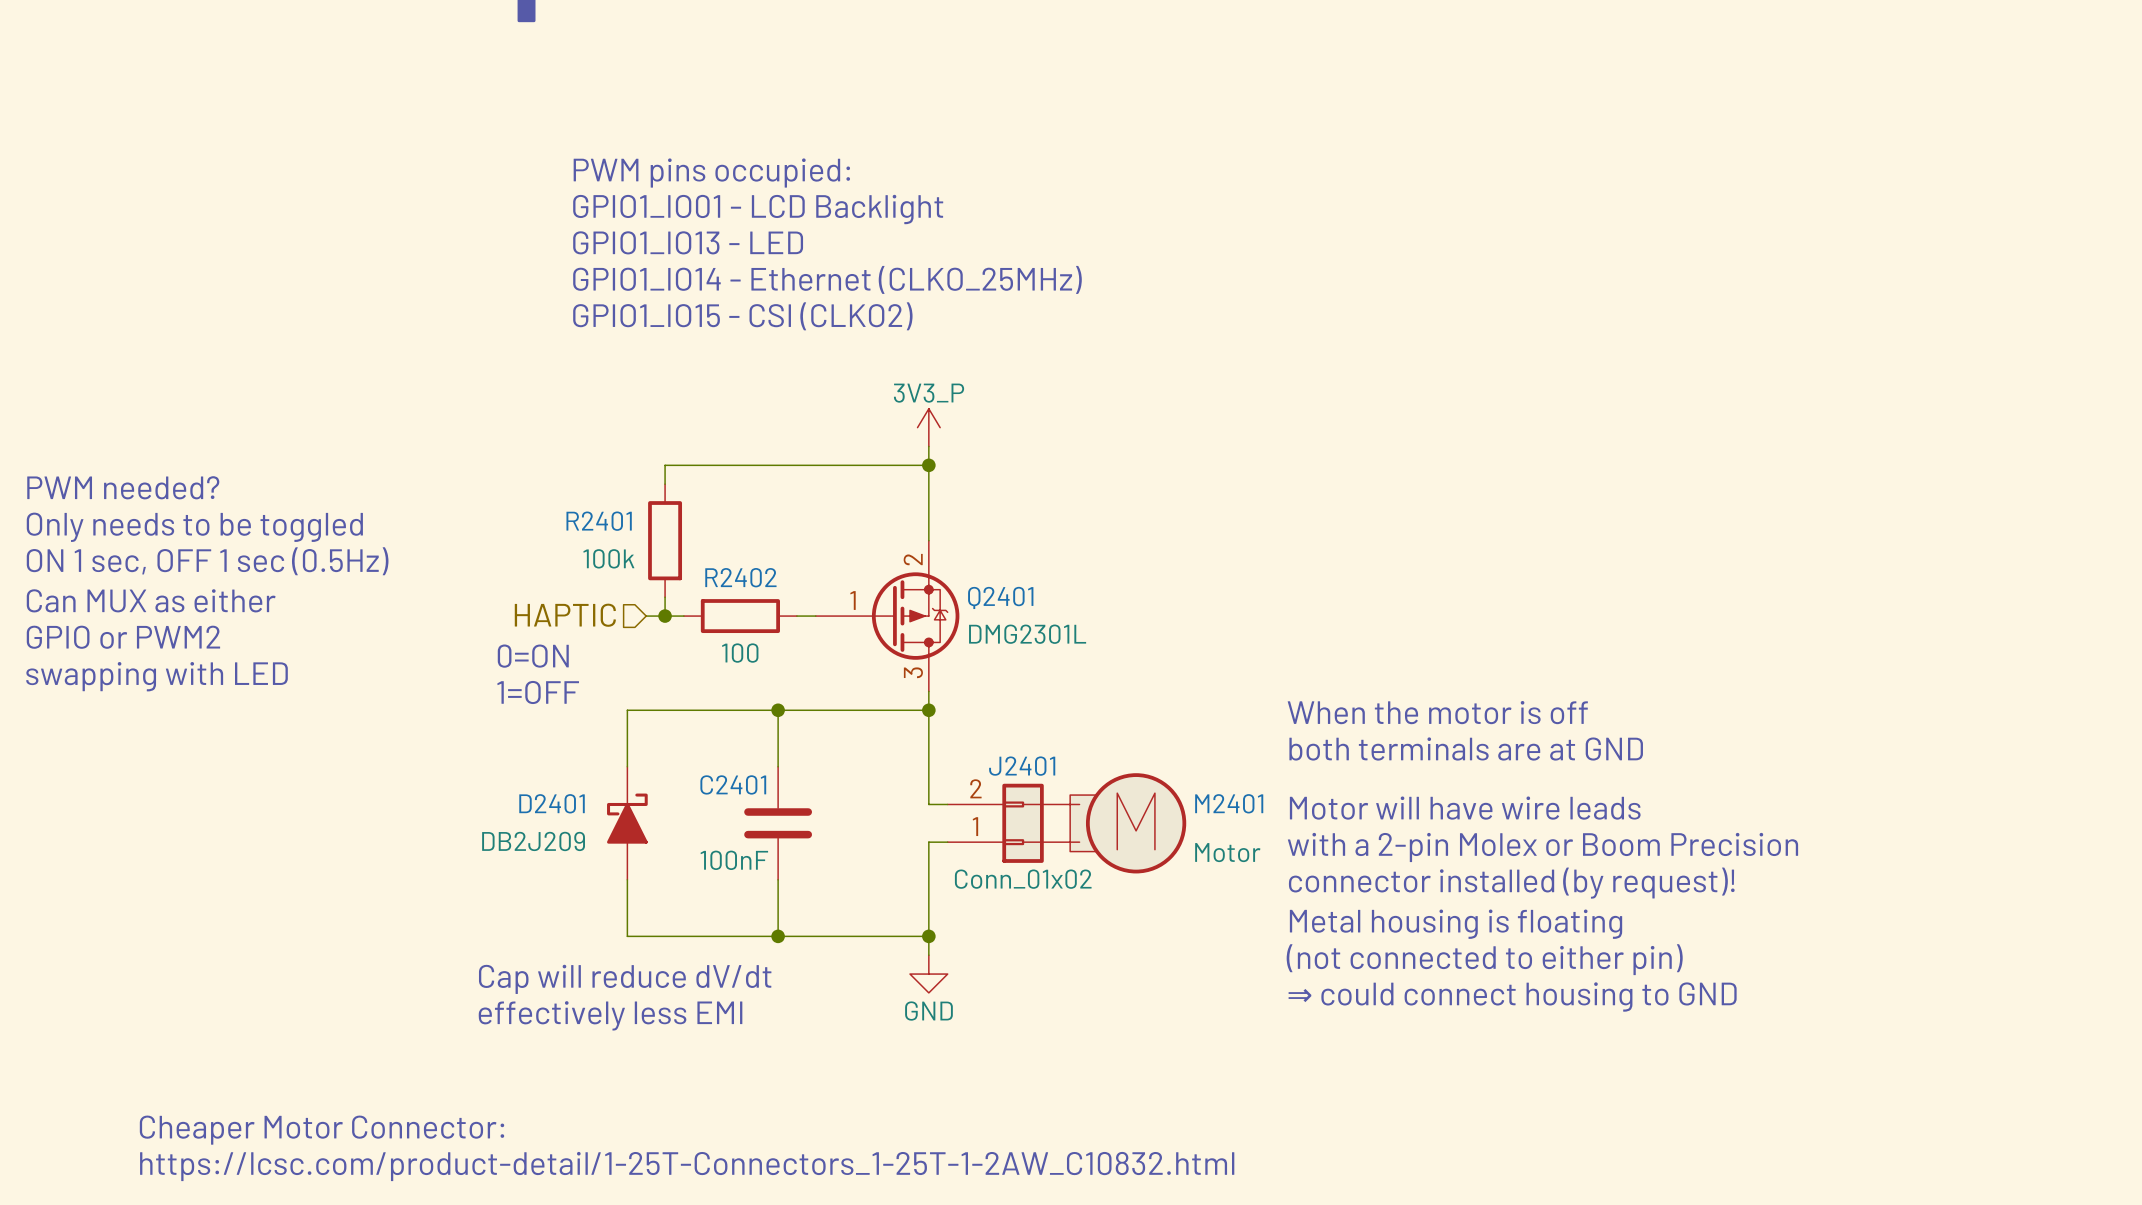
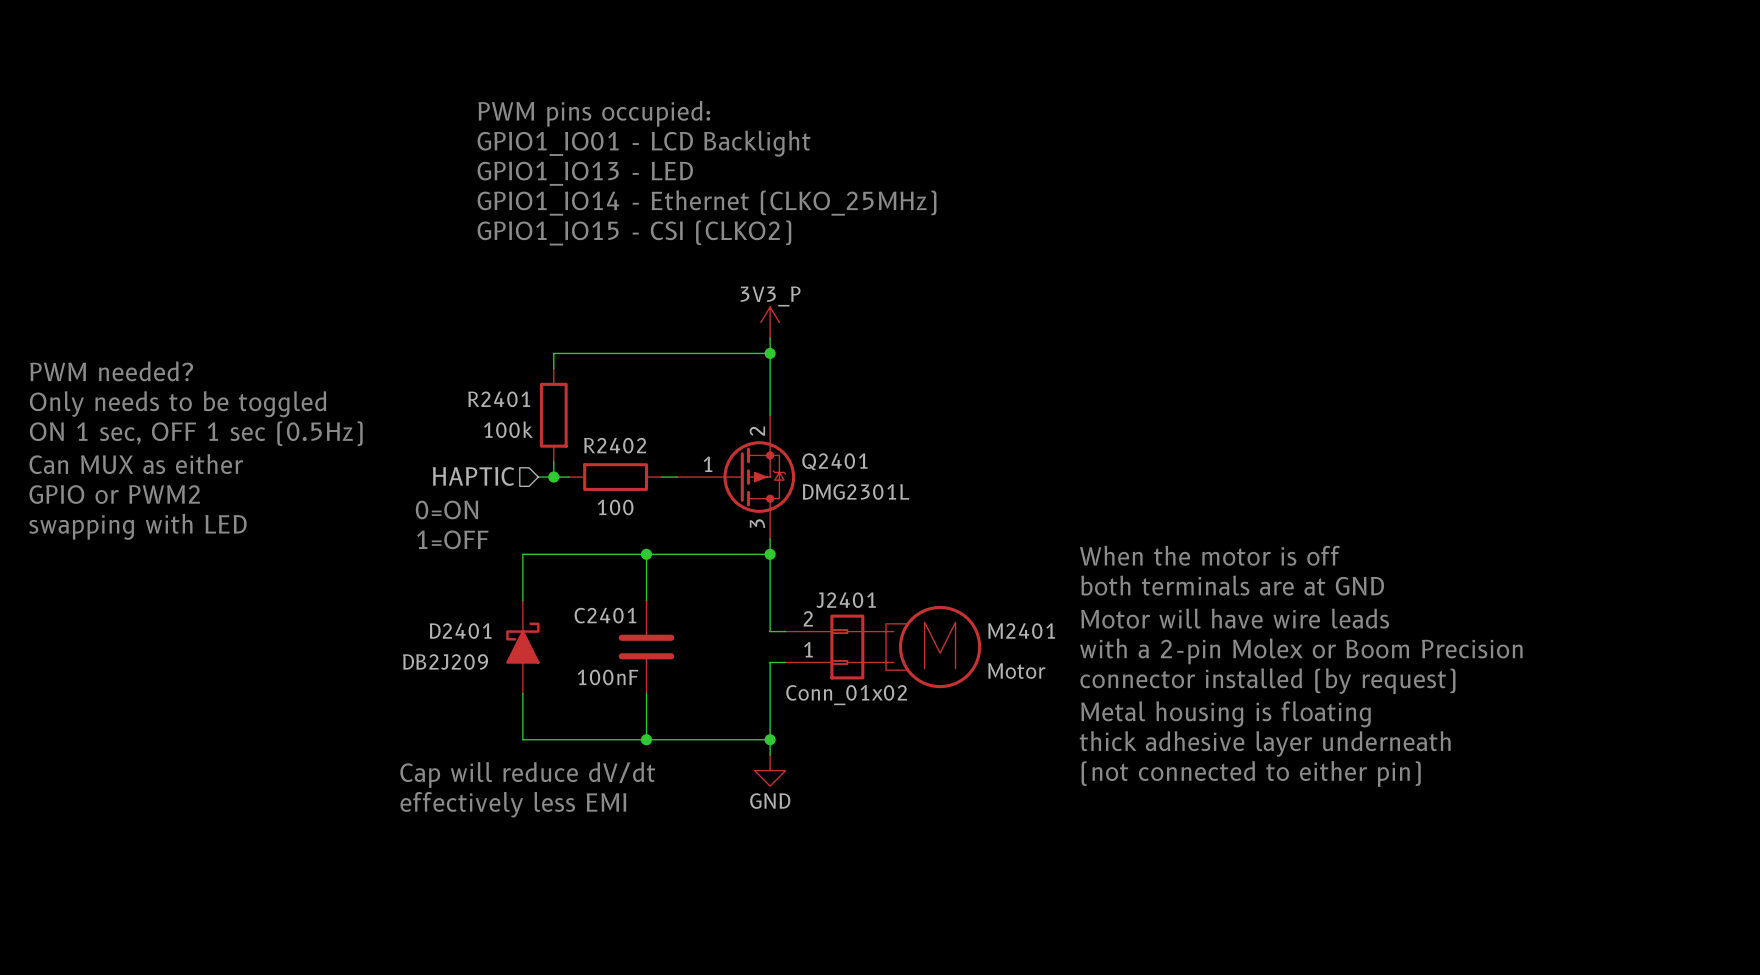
text position: When the motor is off (1437, 712) -> When the motor is off (1210, 555)
text position: both terminals are at GND (1466, 749) -> both terminals are at GND (1232, 585)
text position: Motor will have wire leads (1465, 808) -> Motor will have wire leads (1235, 618)
text position: with a 2-pin Molex or Boom Precision (1542, 847) -> with a 2-pin Molex or Boom Precision (1301, 651)
text: connector installed (by request)! (1511, 883) -> connector installed (by request) (1267, 681)
text position: Metal housing is floating (1456, 924) -> Metal housing is floating (1225, 714)
text: none -> thick adhesive layer underneath (1265, 743)
text position: (not connected to either pin) (1484, 959) -> (not connected to either pin) (1251, 773)
text: ⇒ could connect housing to GND (1512, 997) -> none
text: Cheaper Motor Connector: (322, 1130) -> none
text: https://lcsc.com/product-detail/1-25T-Connectors_1-25T-1-2AW_C10832.html (687, 1166) -> none

